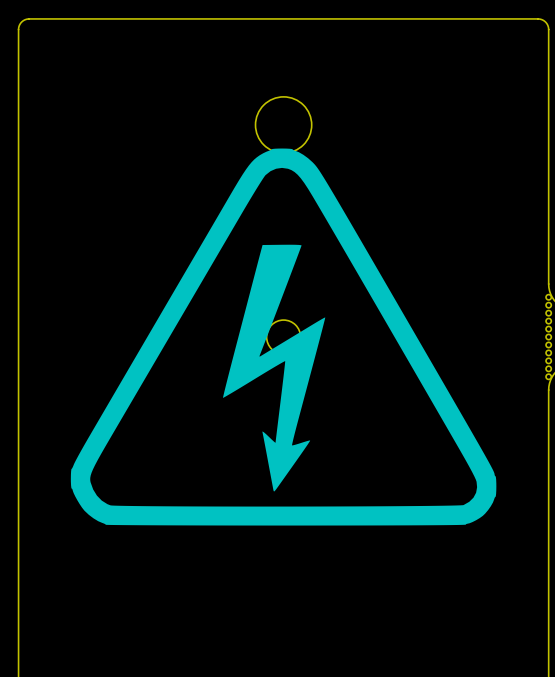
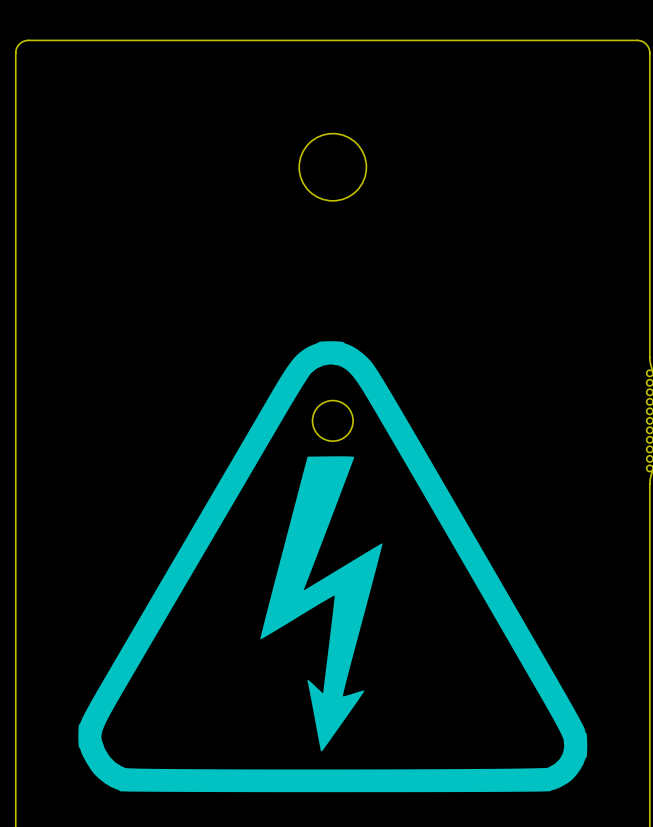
drawing position: (283, 337) -> (332, 566)

